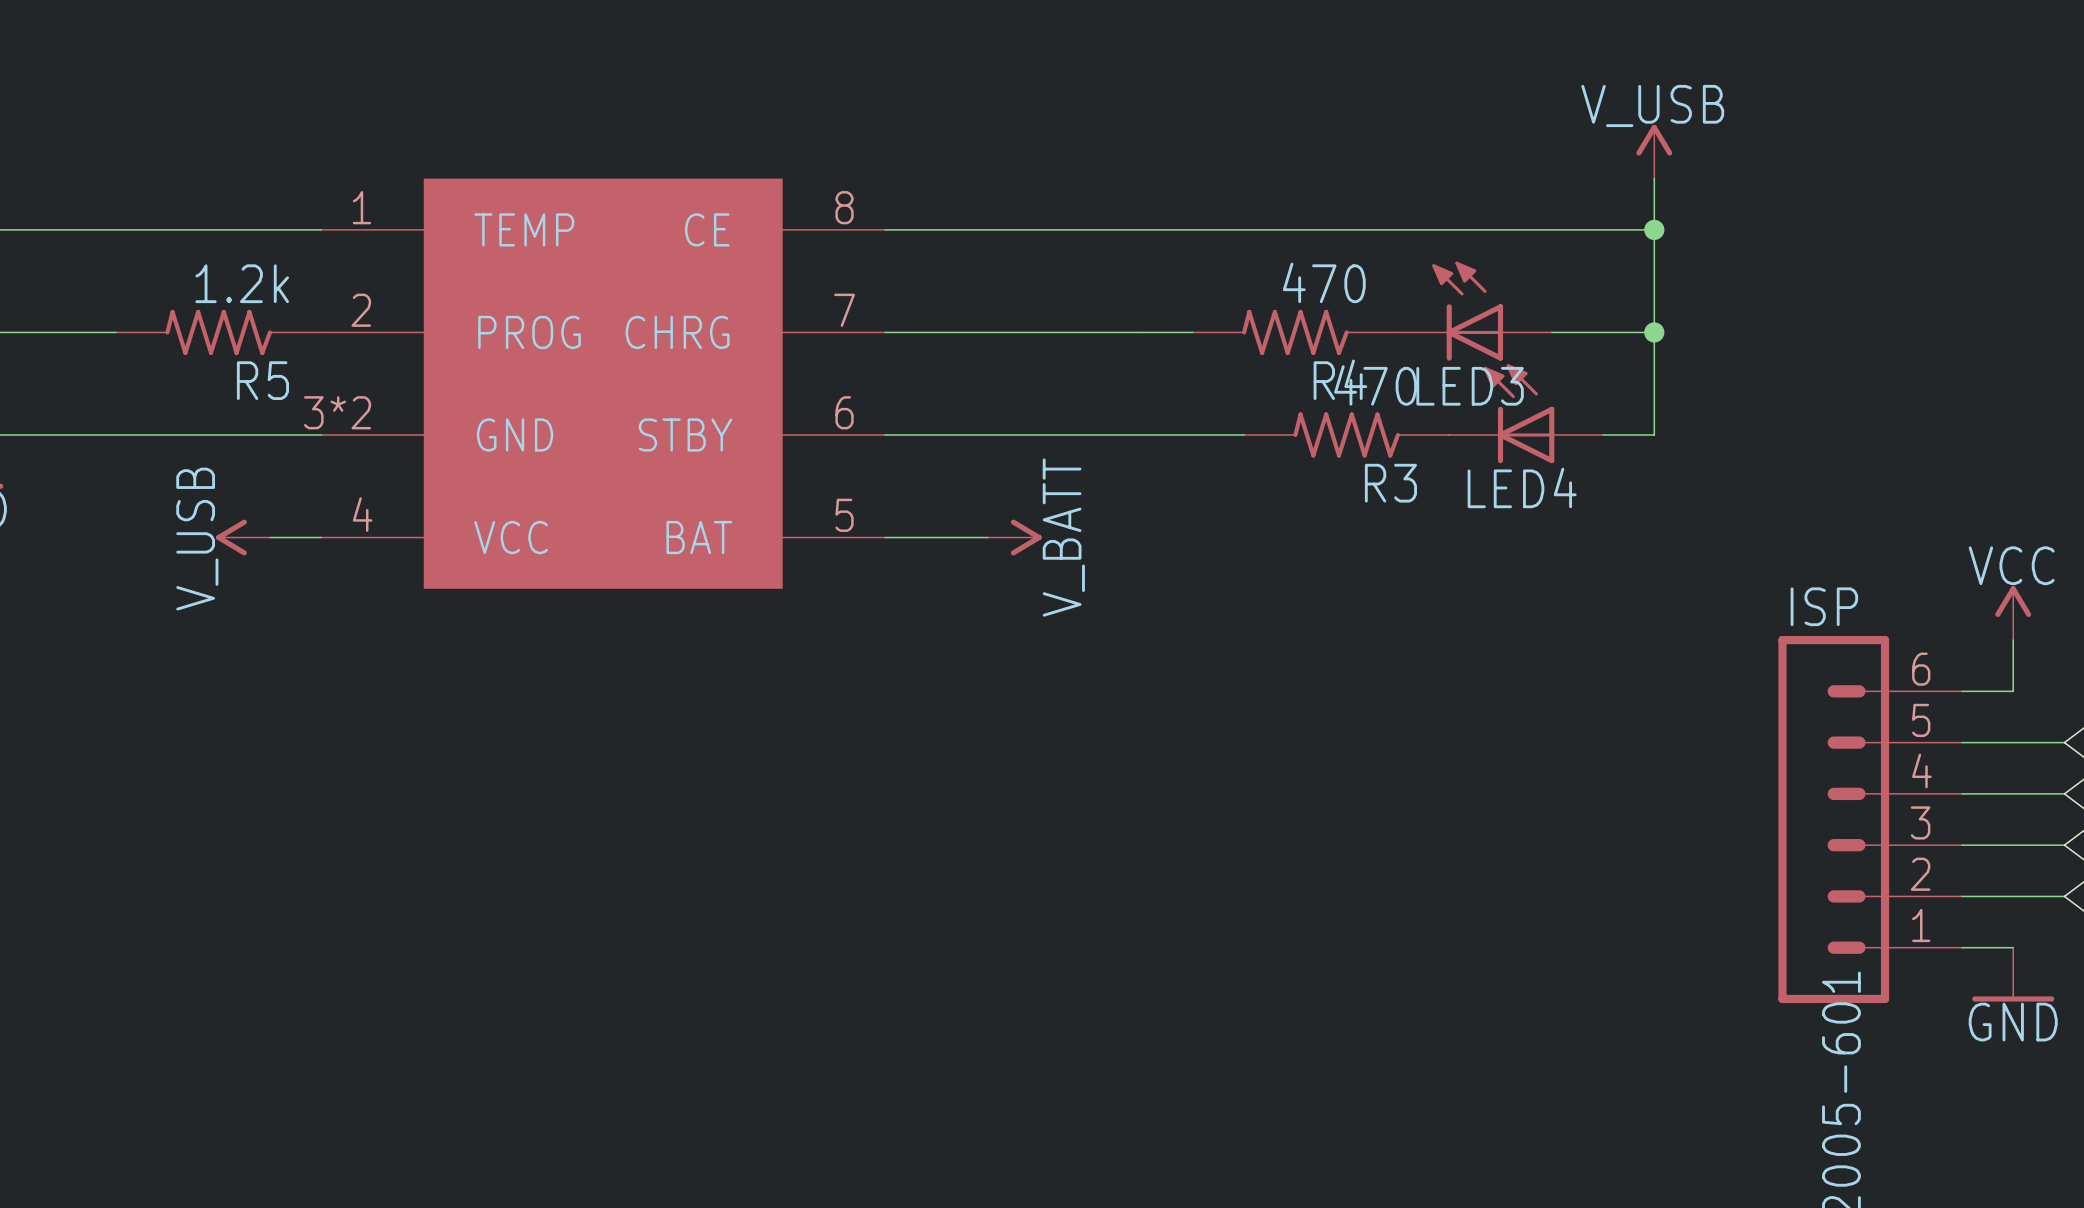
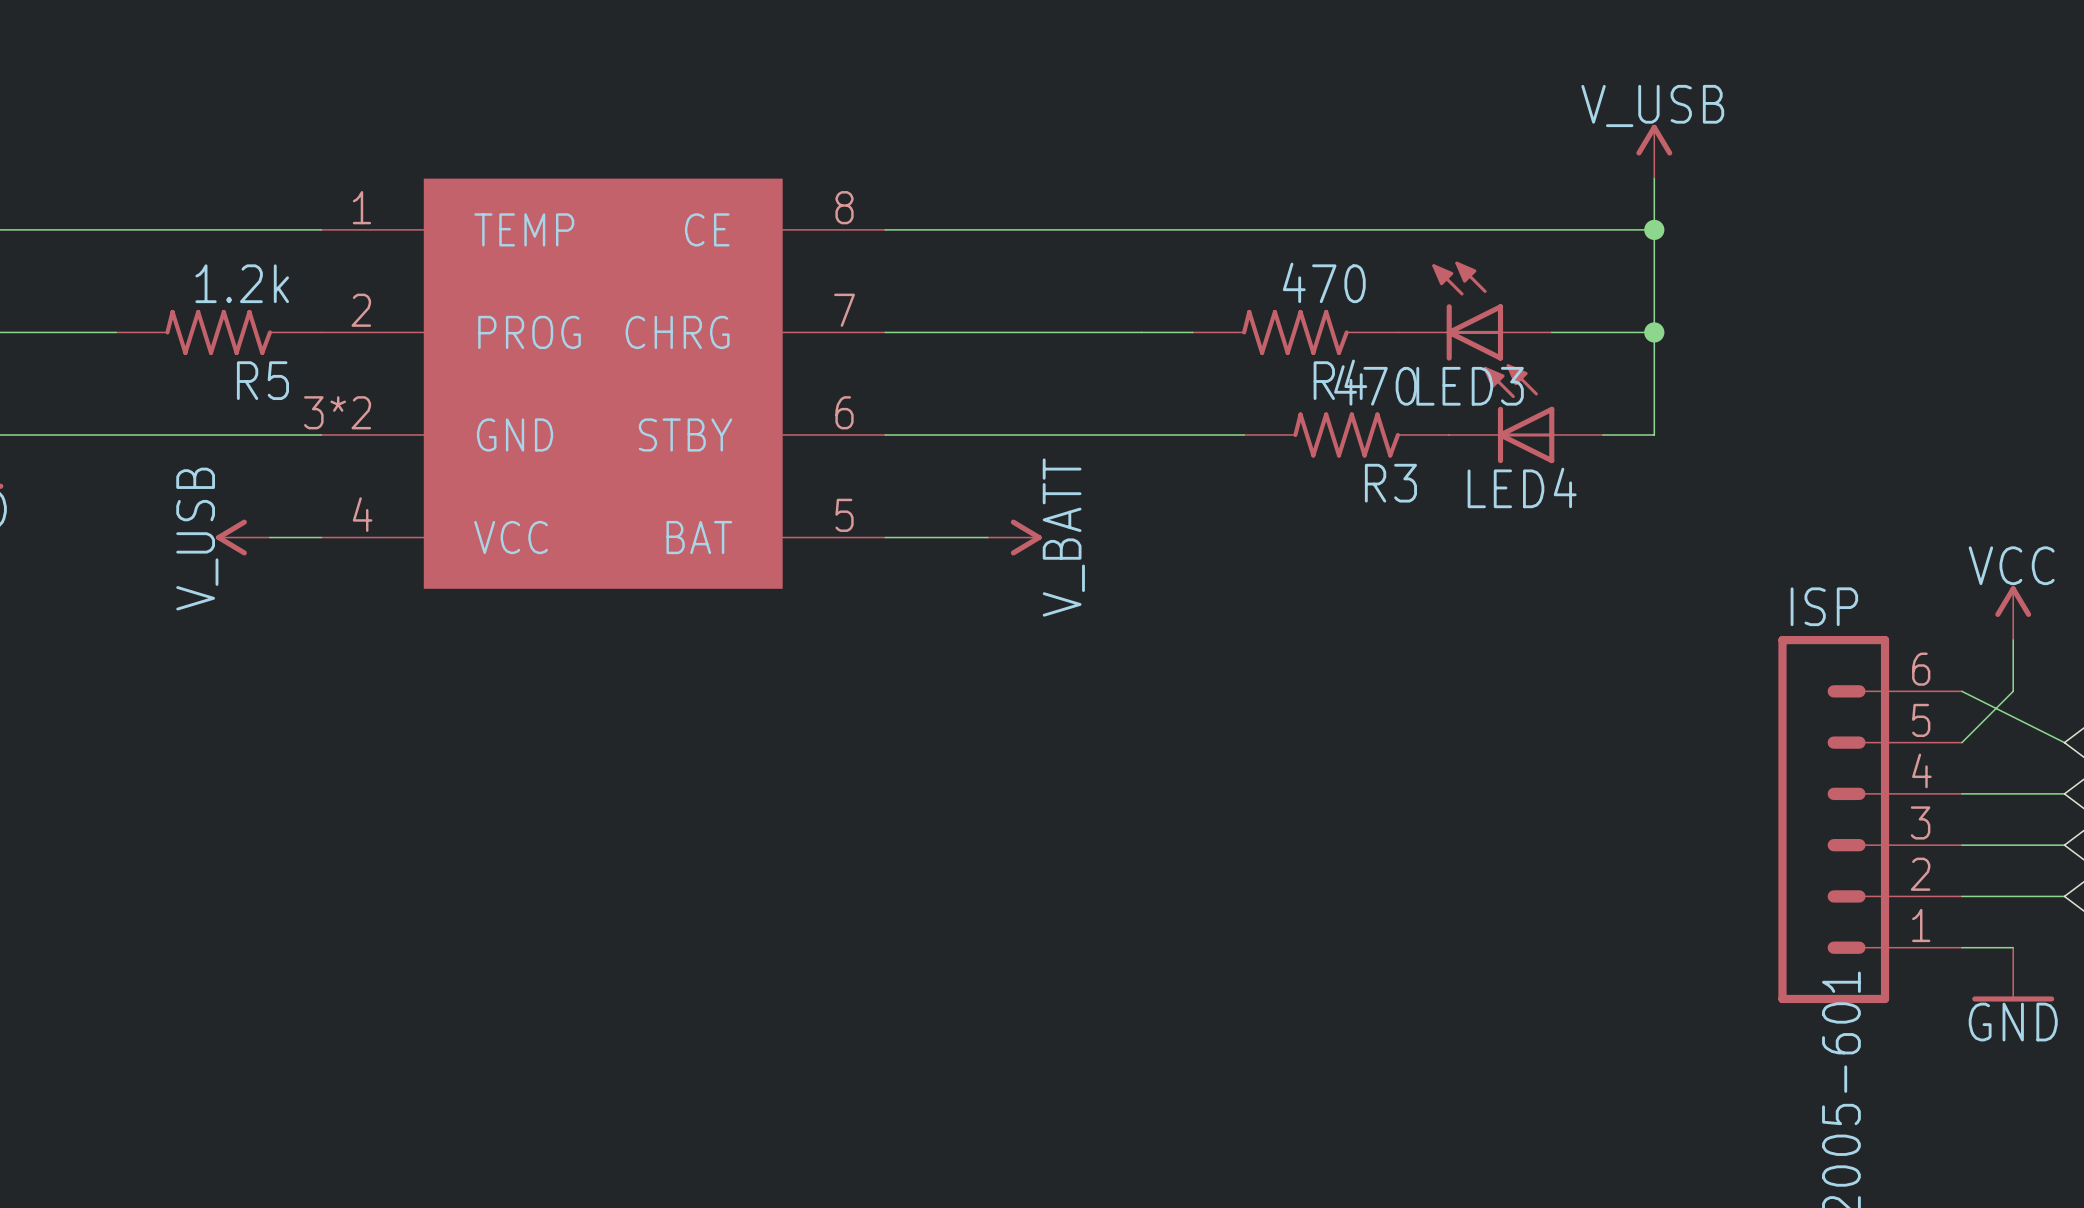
wire: (1961, 691) (2013, 691) -> (1961, 742) (2013, 691)
wire: (1961, 742) (2064, 742) -> (1961, 691) (2064, 742)

